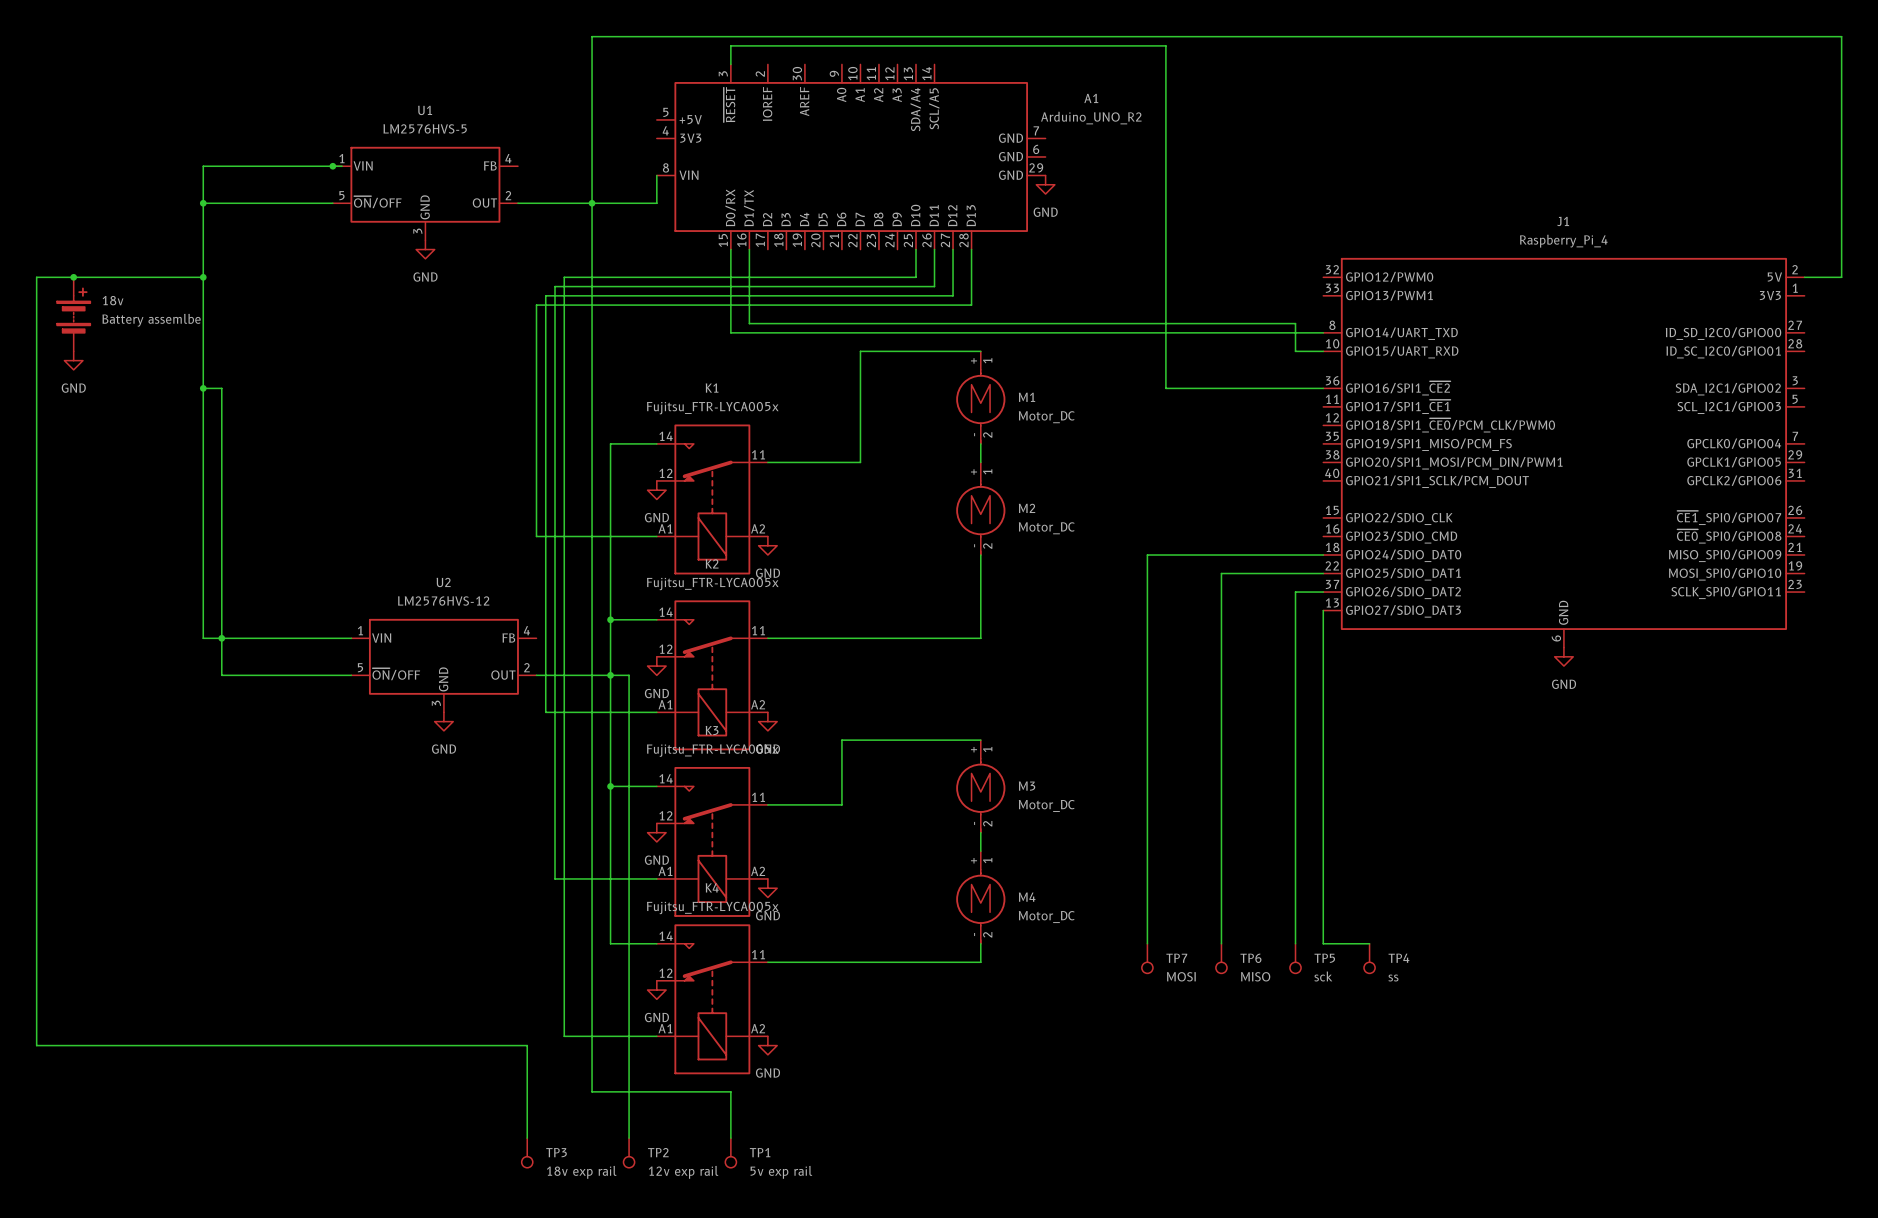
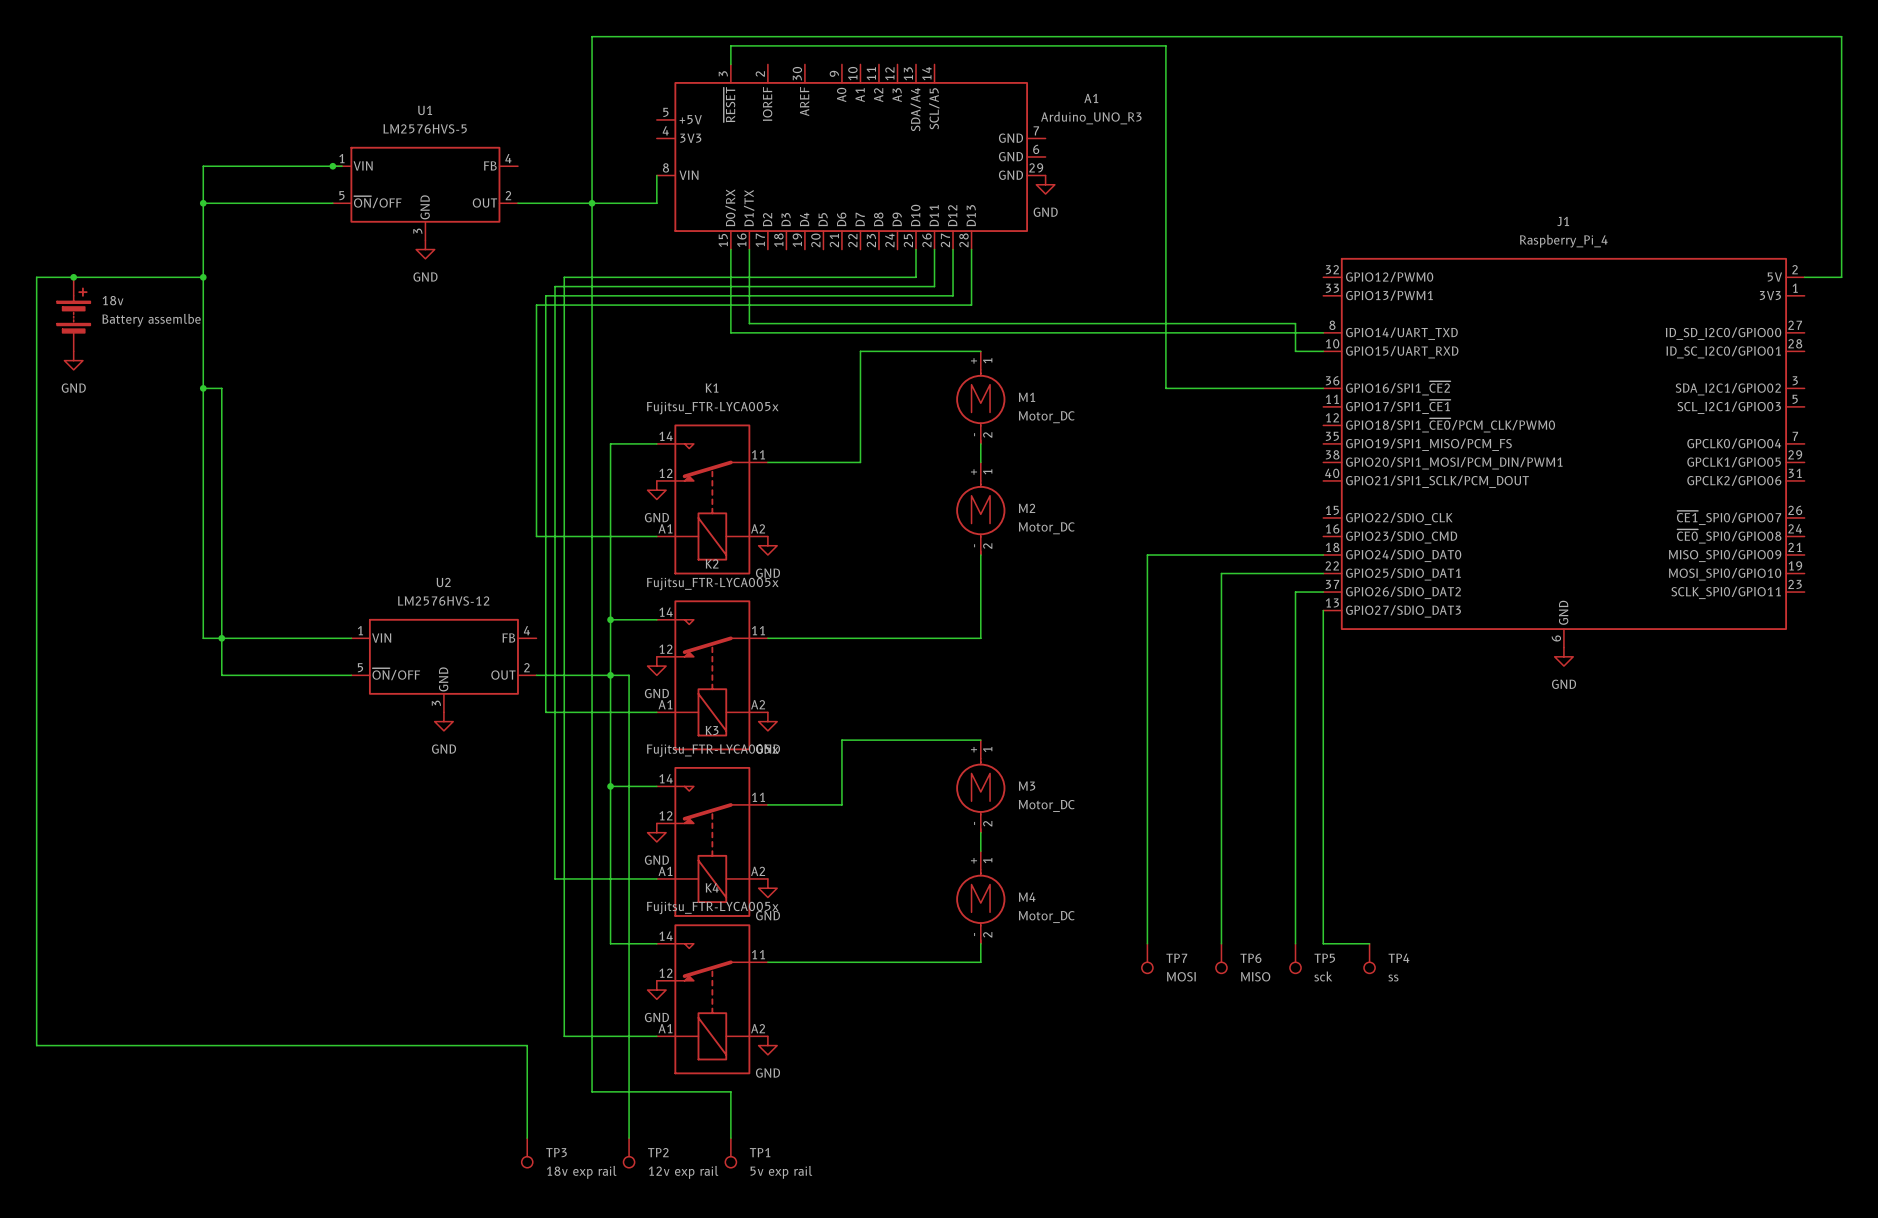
A1 value: Arduino_UNO_R2 (1091, 118) -> Arduino_UNO_R3 (1091, 118)

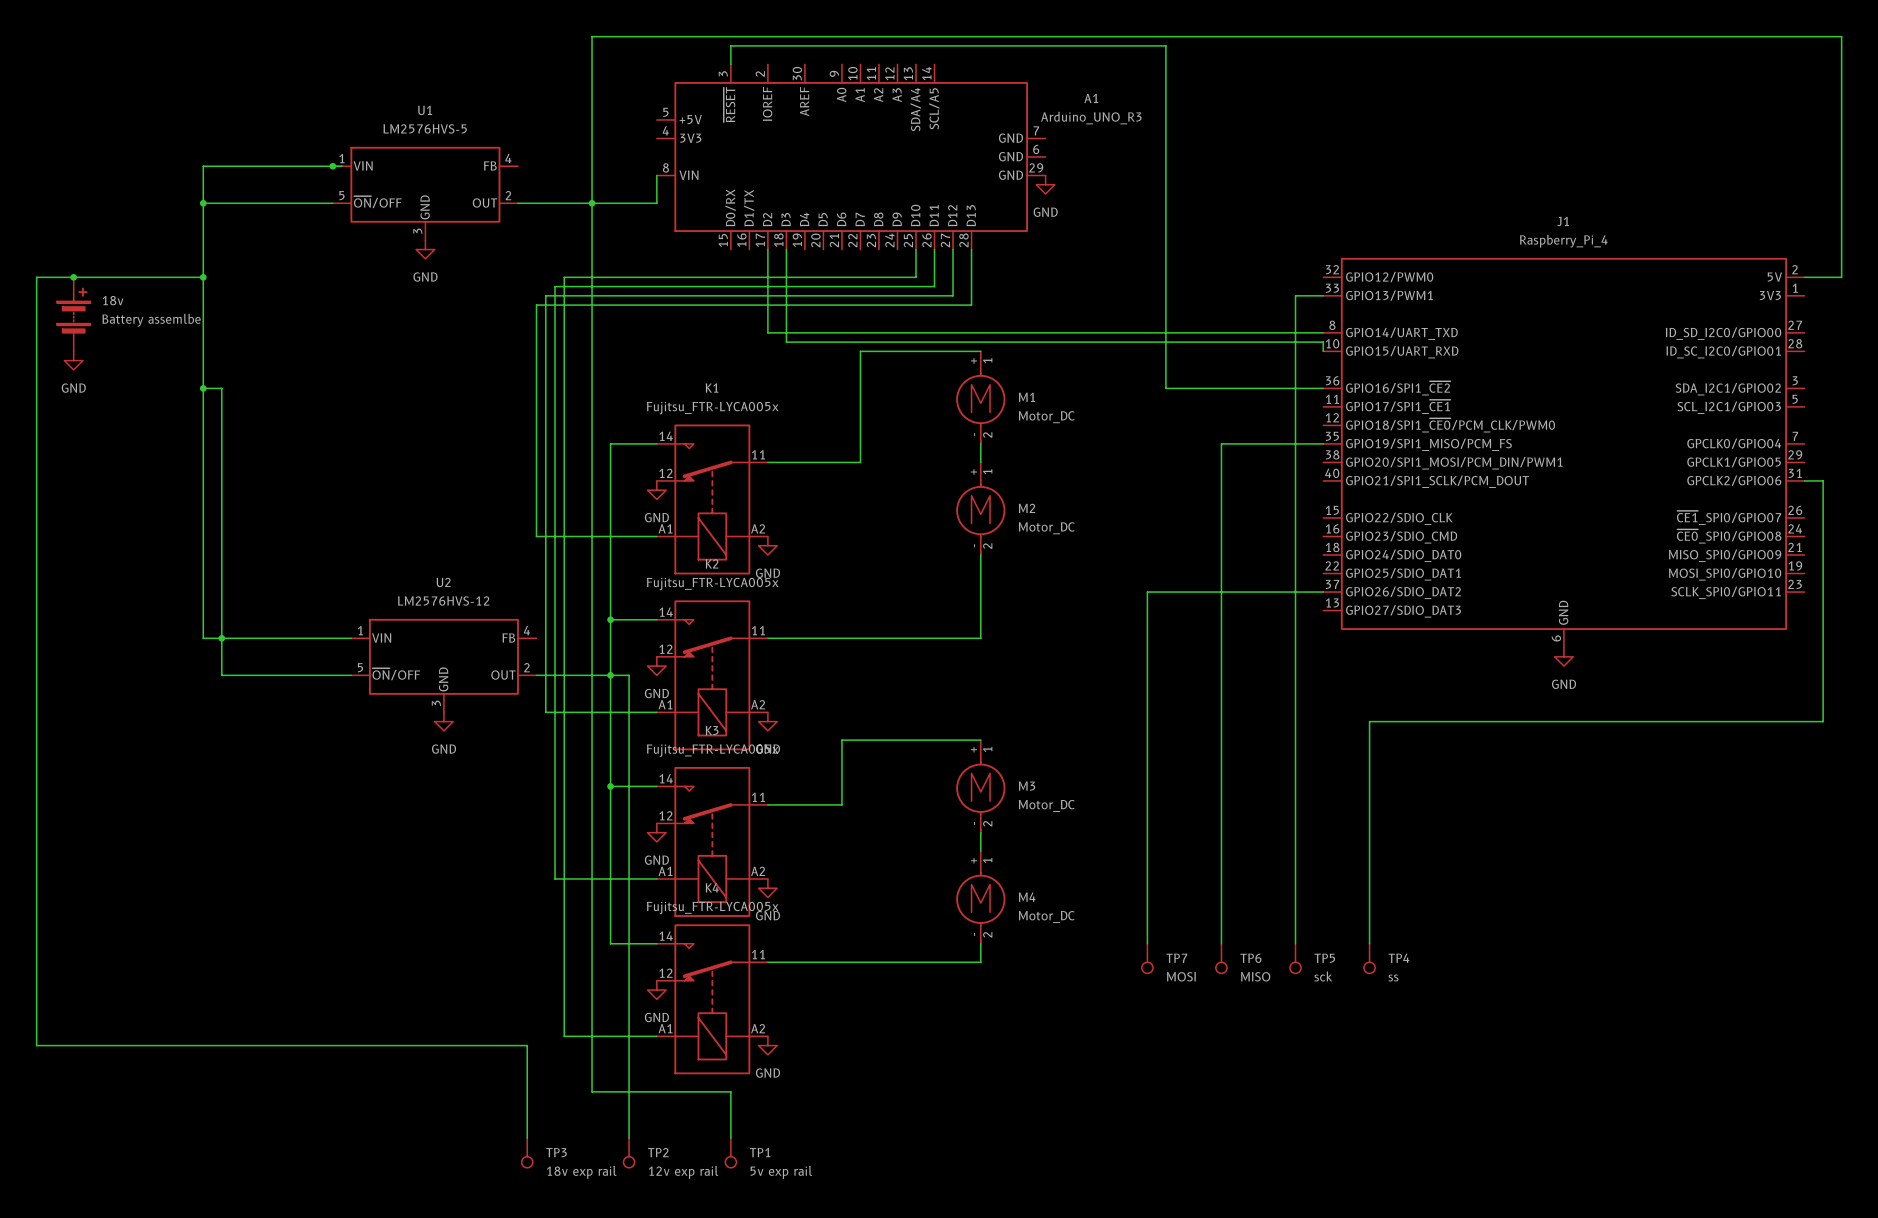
wire: (730, 249) (730, 332) (767, 332) -> (767, 249) (767, 332)
wire: (749, 249) (749, 323) (1295, 323) -> (1323, 295) (1295, 295) (1295, 323)
wire: (1295, 351) (1323, 351) -> (786, 249) (786, 342) (1323, 342) (1323, 351)
wire: (1323, 555) (1147, 555) (1147, 592) -> (1295, 351) (1295, 592) (1147, 592)
wire: (1221, 573) (1323, 573) -> (1221, 573) (1221, 443) (1323, 443)
wire: (1323, 610) (1323, 943) (1369, 943) -> (1804, 480) (1823, 480) (1823, 721) (1369, 721) (1369, 943)

